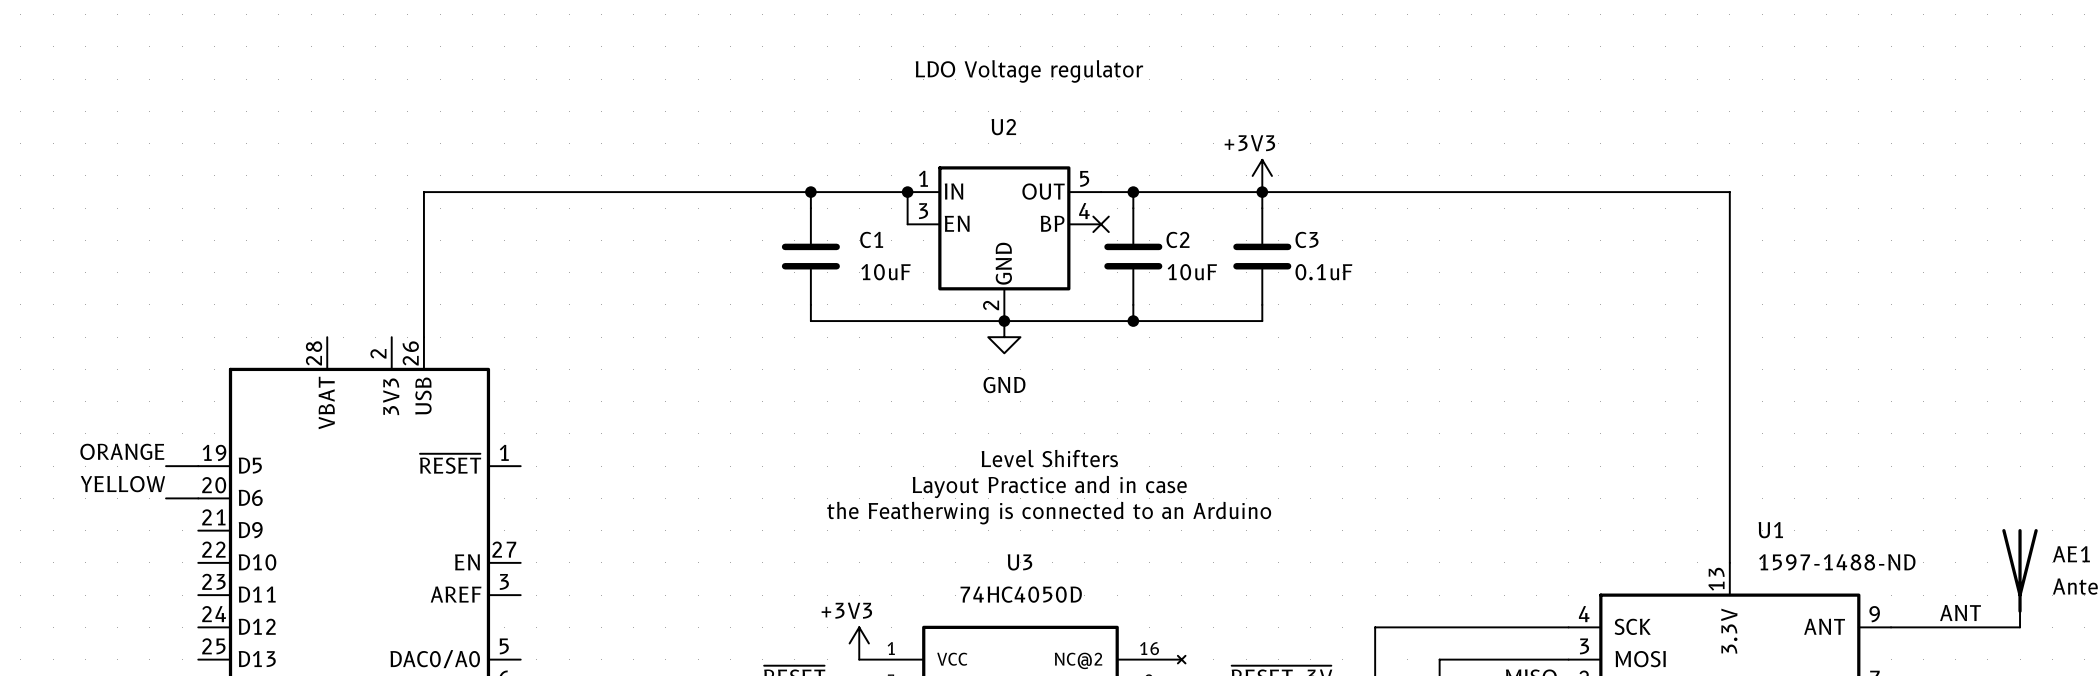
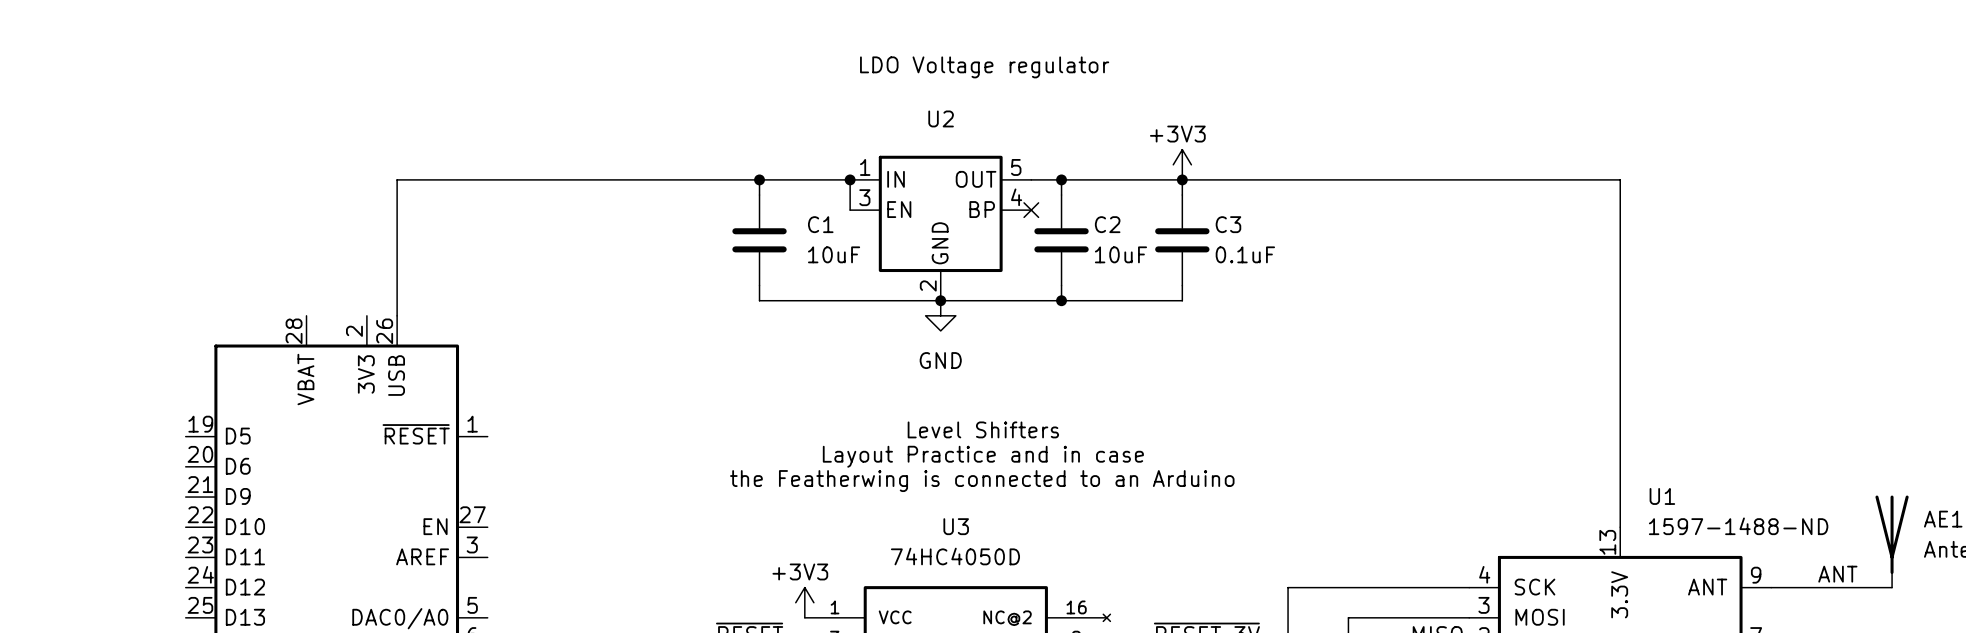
label: ORANGE (122, 451) -> none
wire: (166, 466) (198, 466) -> none
label: YELLOW (122, 484) -> none
wire: (166, 498) (198, 498) -> none

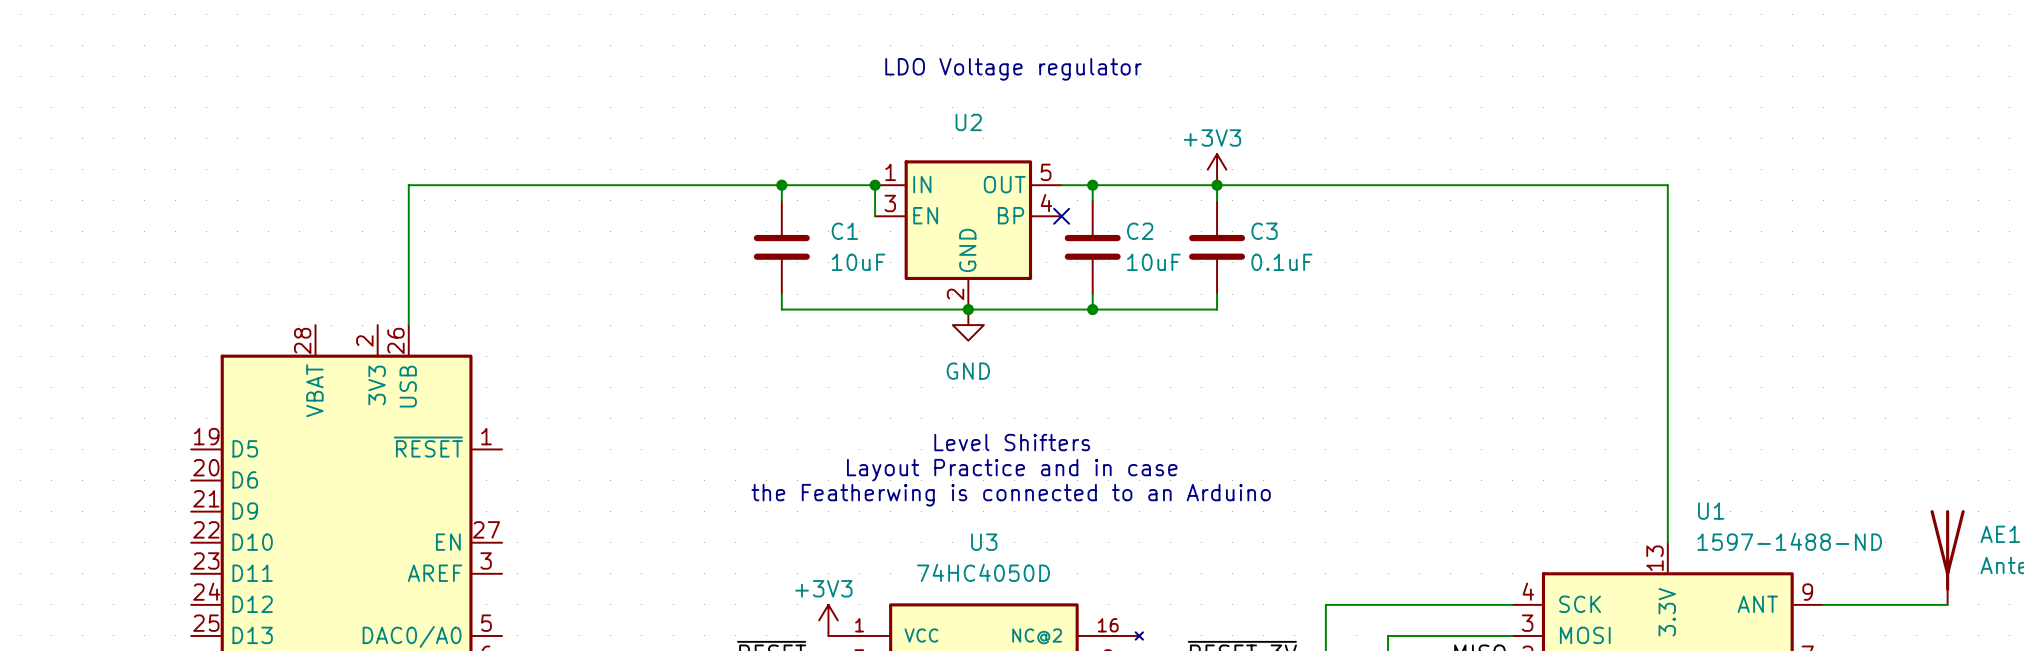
label: ANT (1837, 574) -> none

